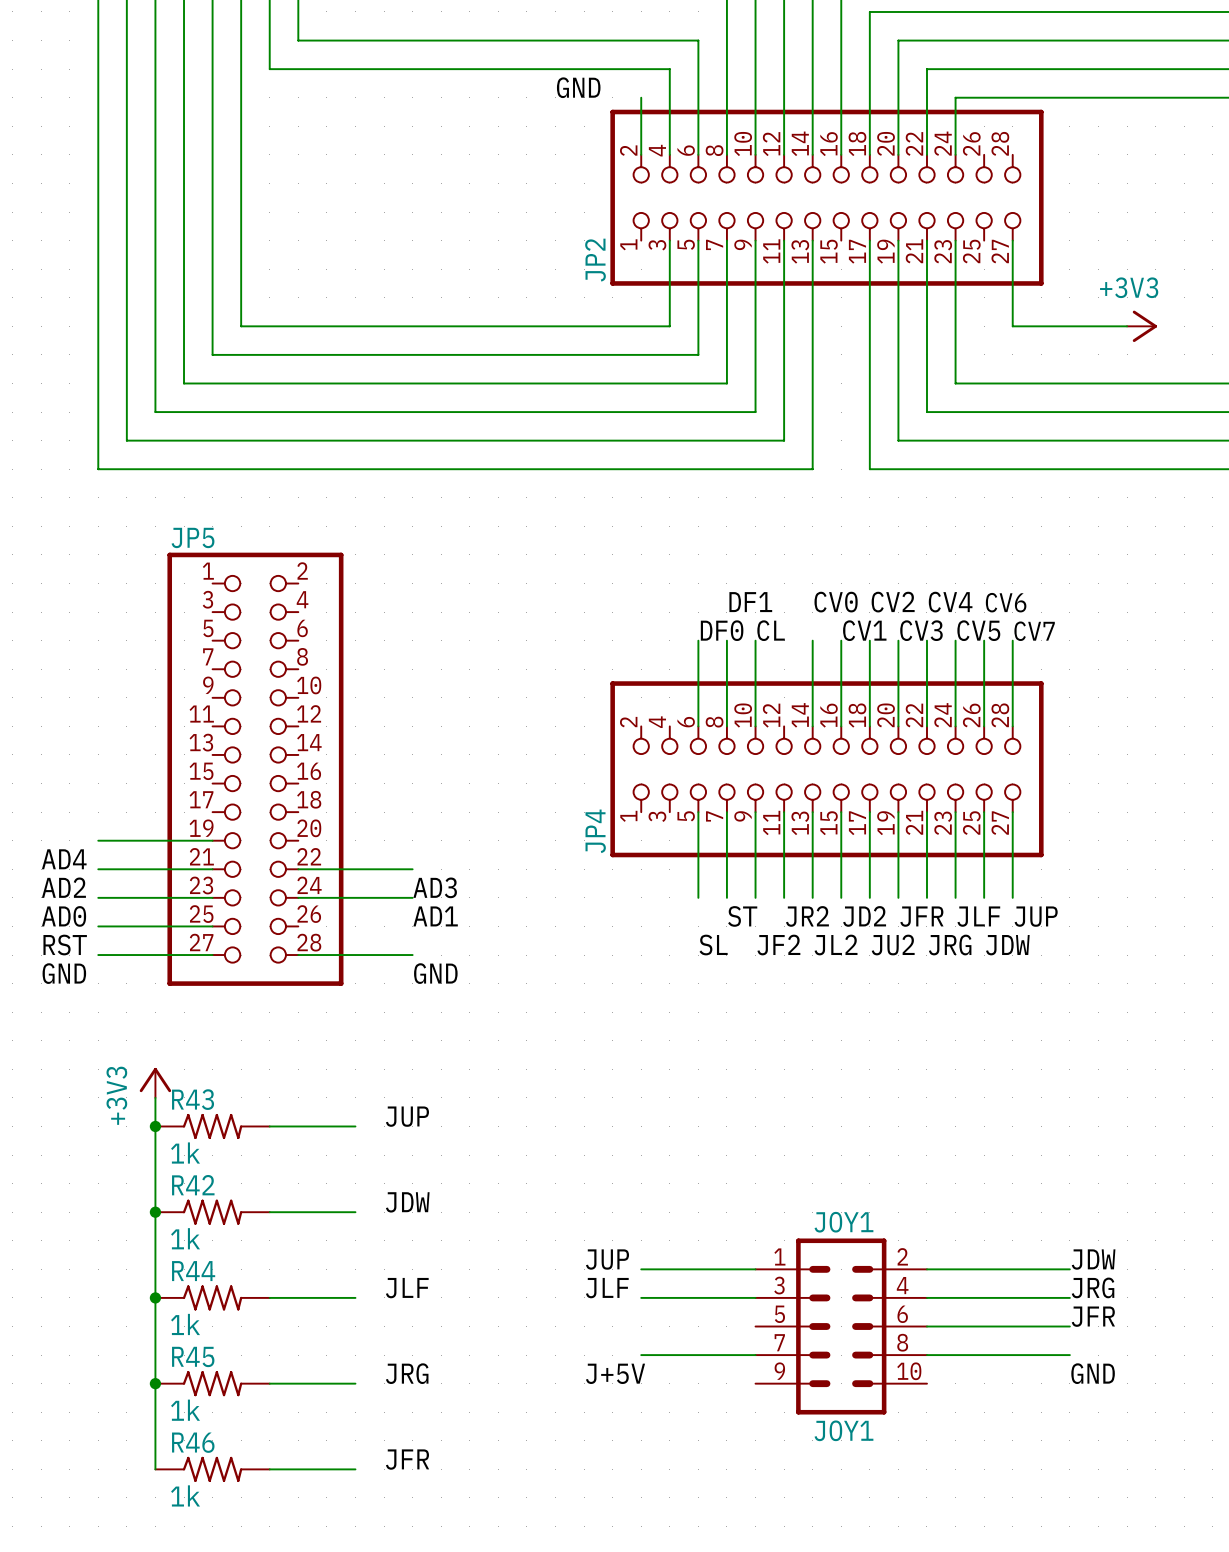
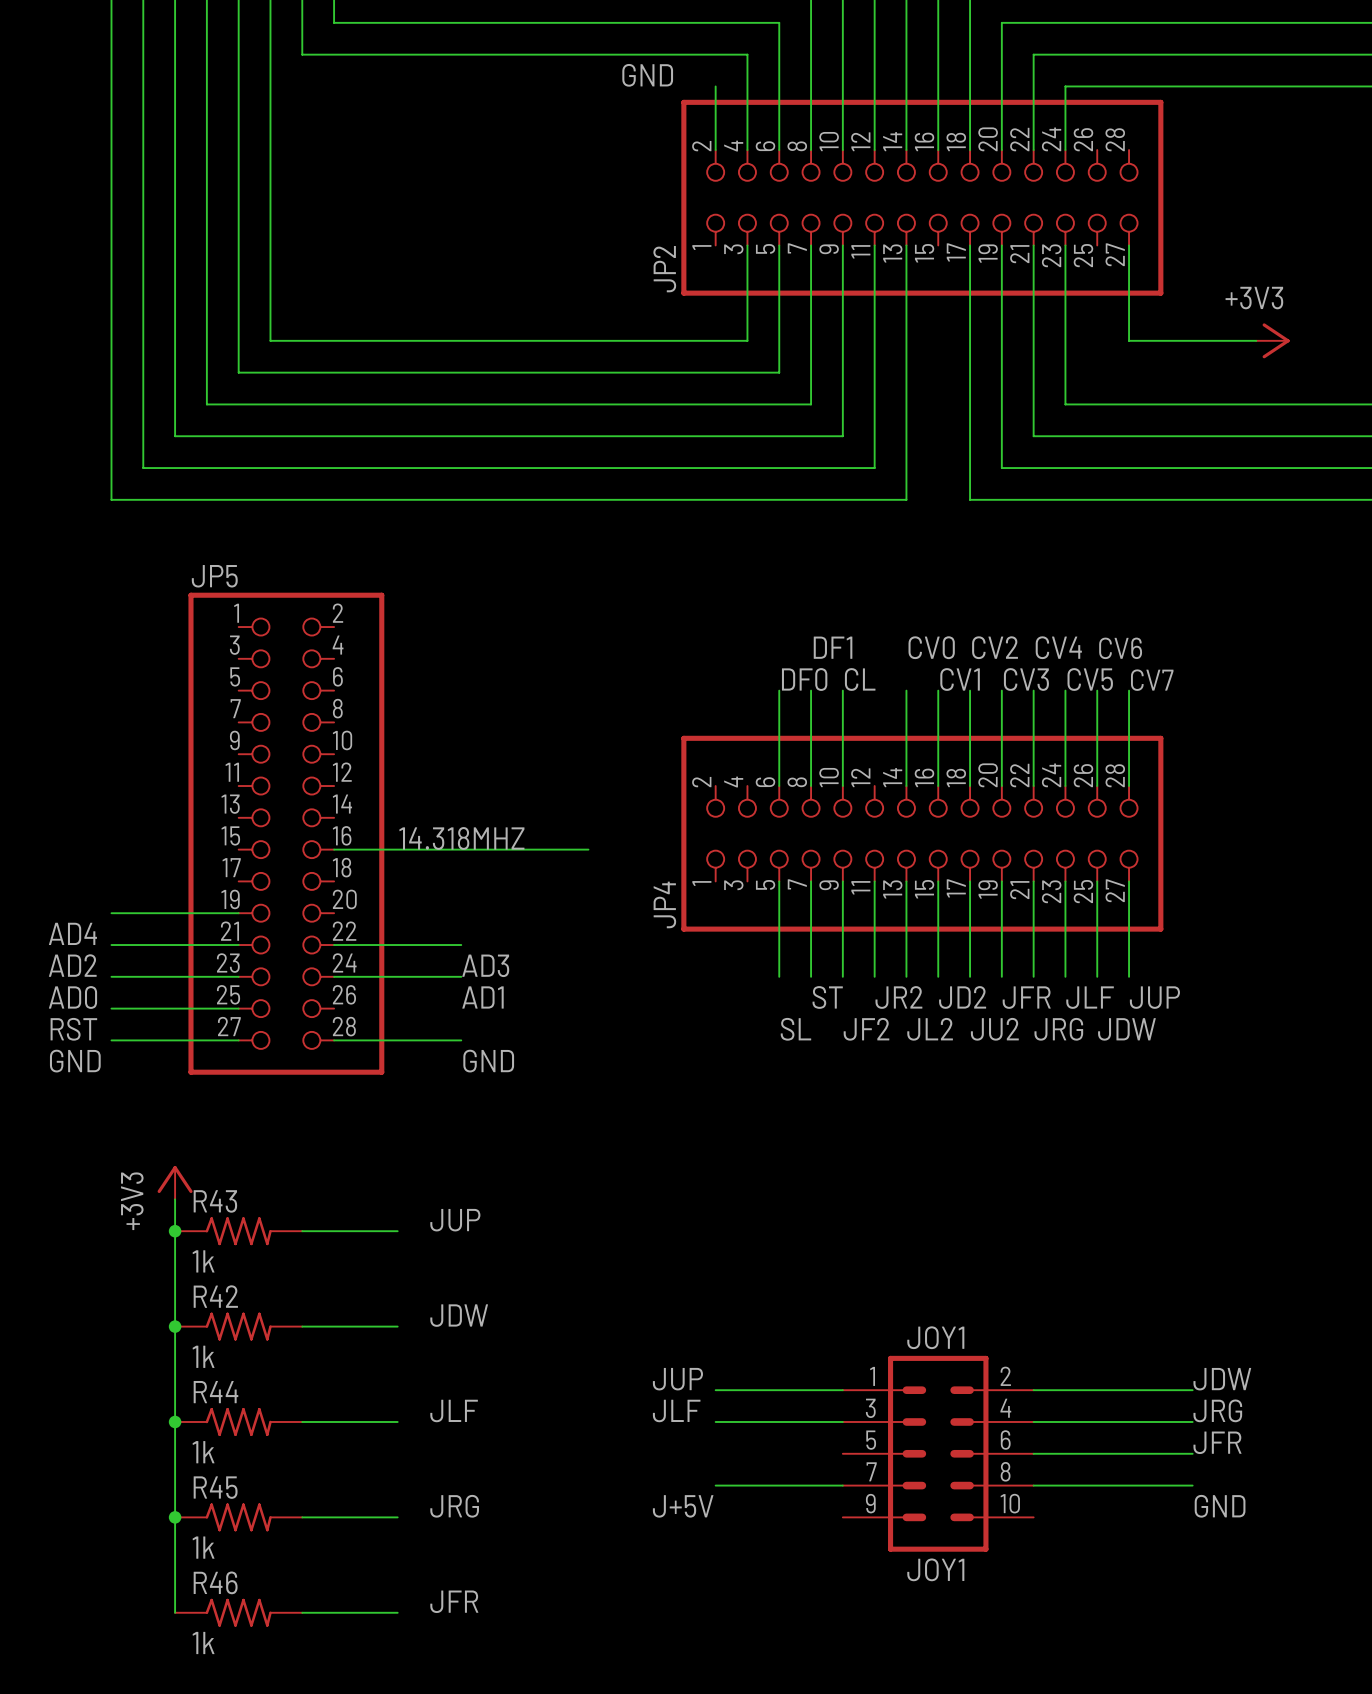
label: none -> 14.318MHZ (461, 838)
wire: none -> (334, 849) (588, 849)

